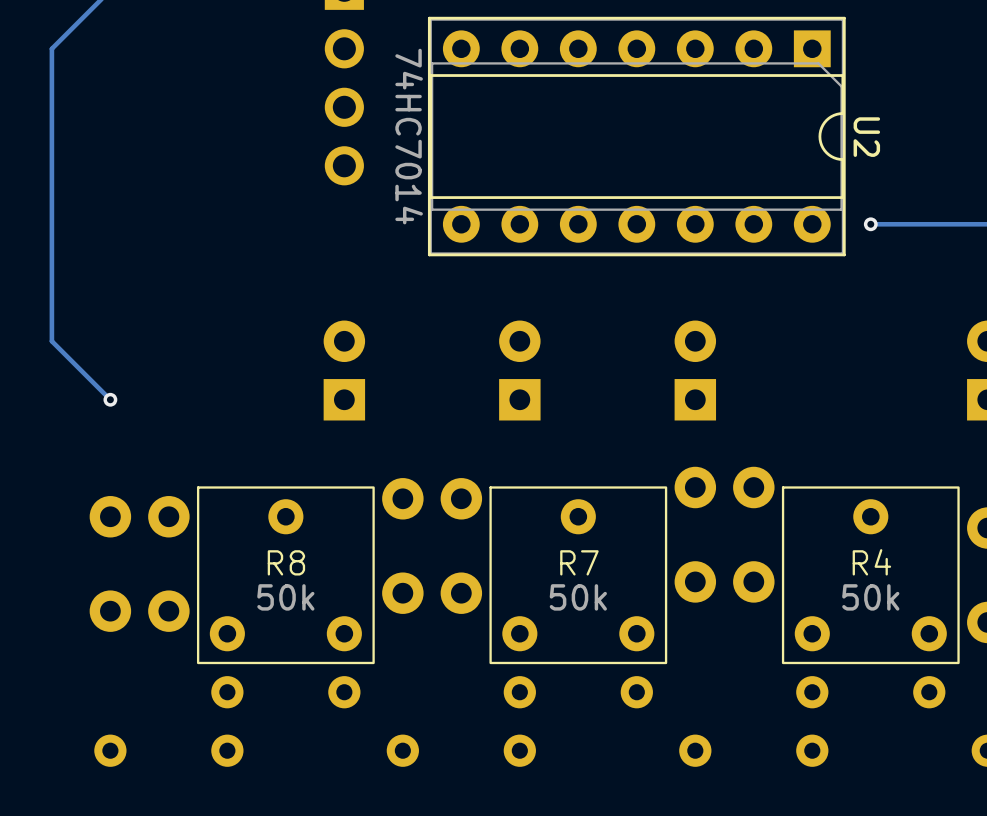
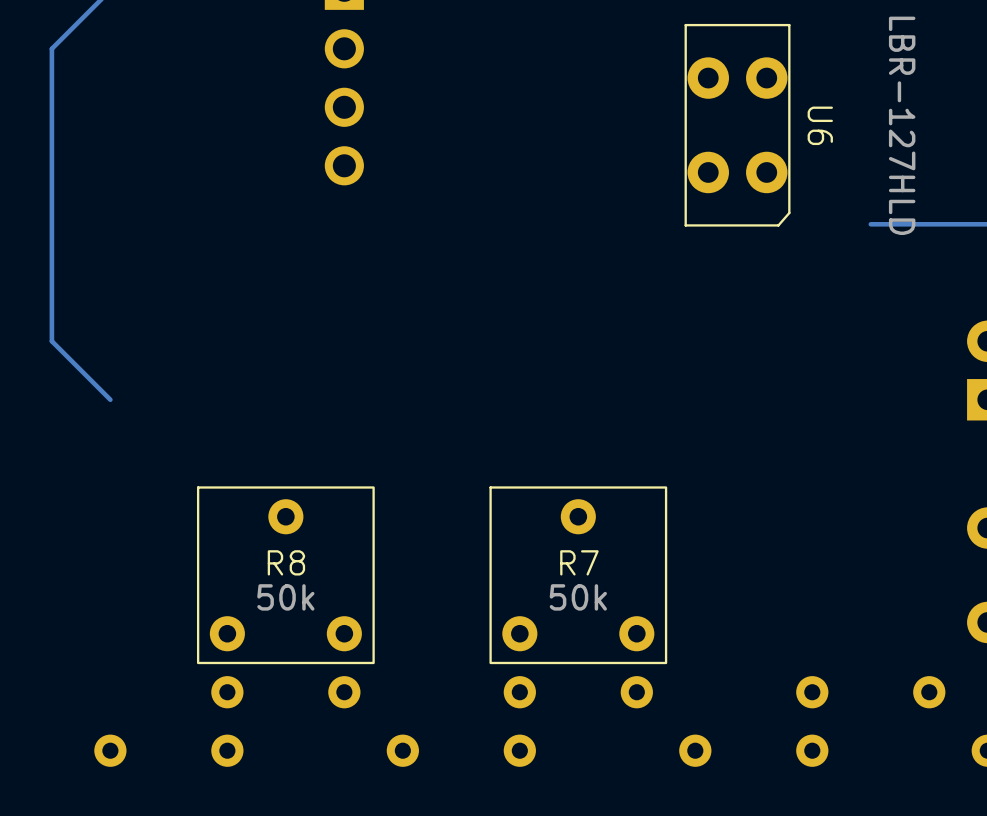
U6: none -> LBR-127HLD (737, 125)
U2: 74HC7014 (636, 136) -> none
via: (870, 224) -> none
part: (344, 370) -> none
part: (519, 370) -> none
part: (695, 370) -> none
via: (110, 399) -> none
part: (724, 534) -> none
part: (432, 545) -> none
part: (139, 563) -> none
R4: 50k (870, 575) -> none

